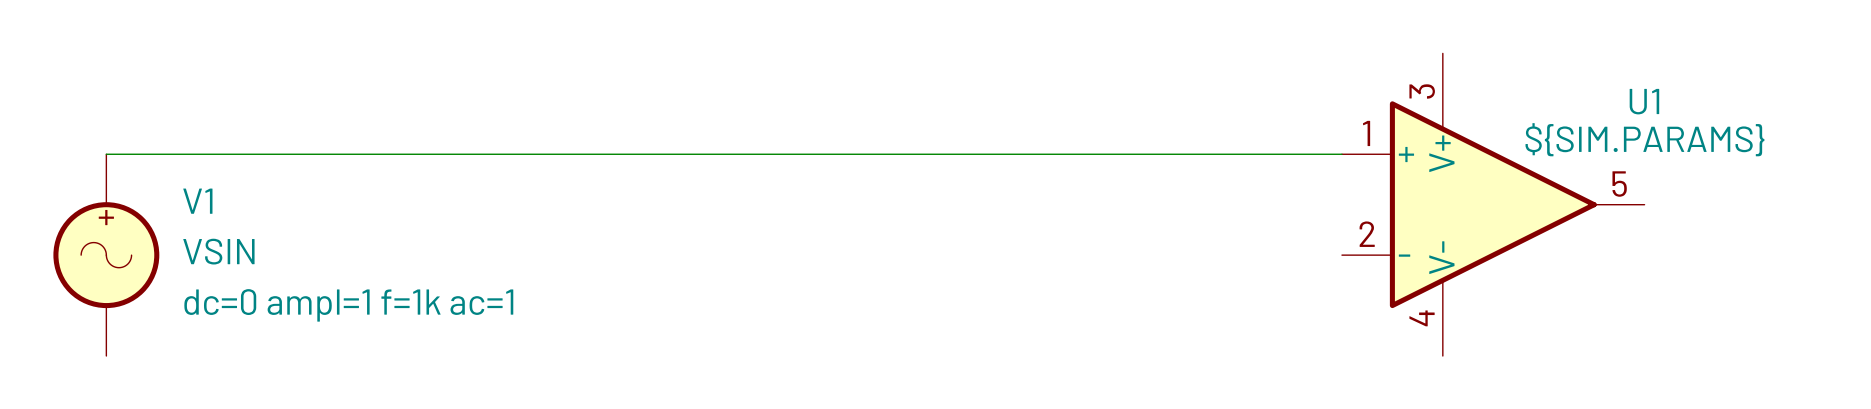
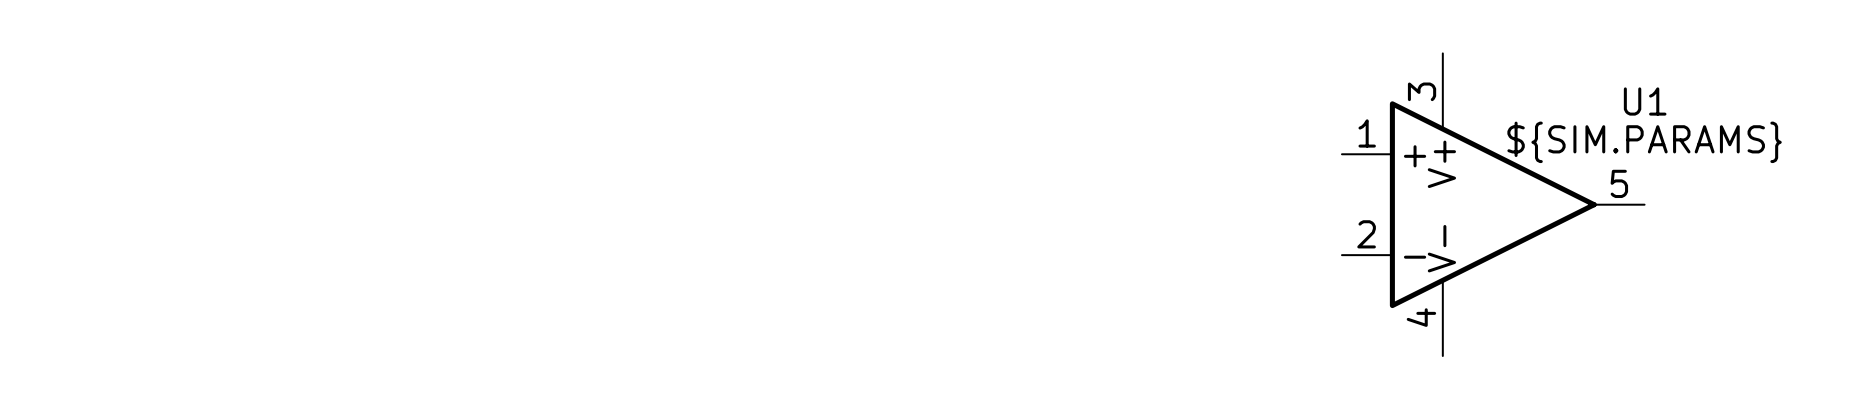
wire: (106, 154) (1341, 154) -> none
V1: VSIN (106, 255) -> none

